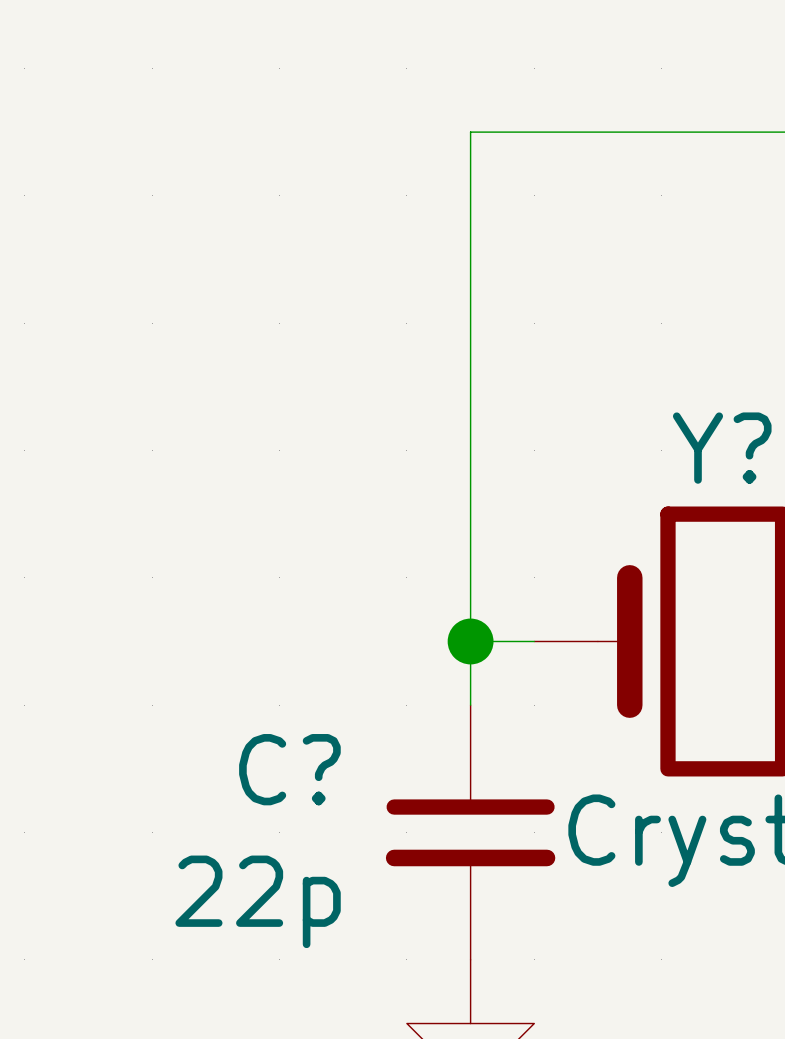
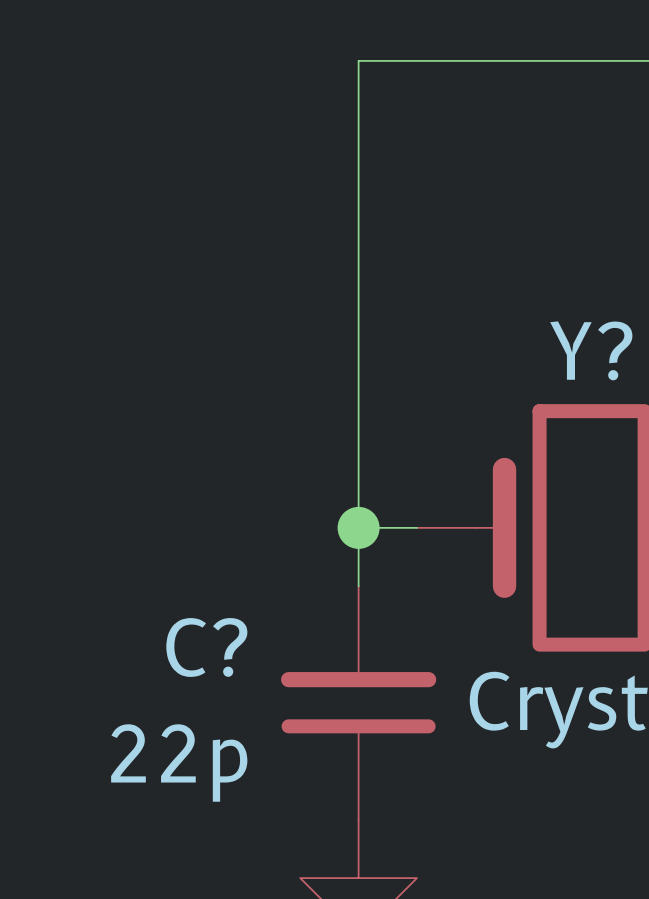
C? rotation: 0° (470, 832) -> 180° (358, 702)

